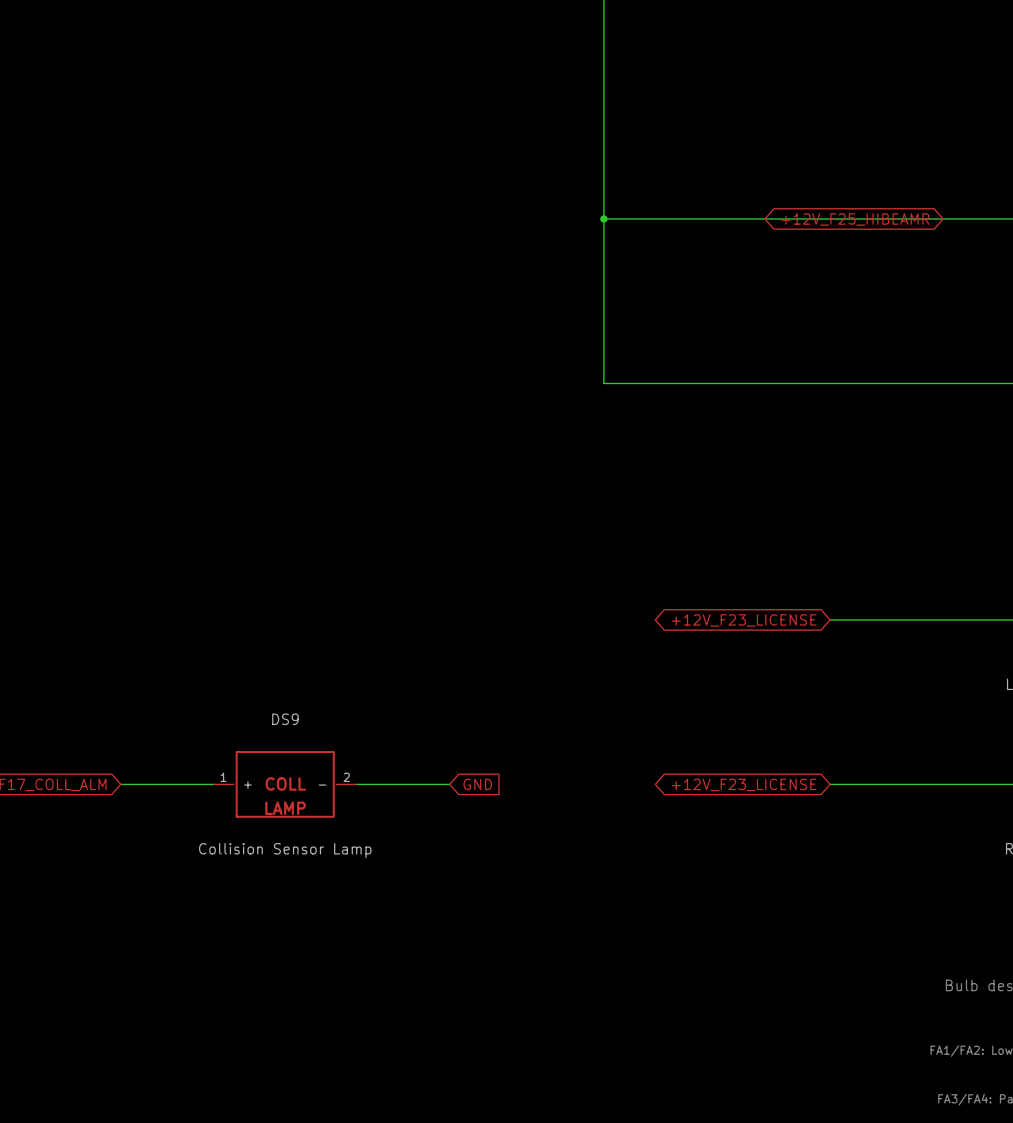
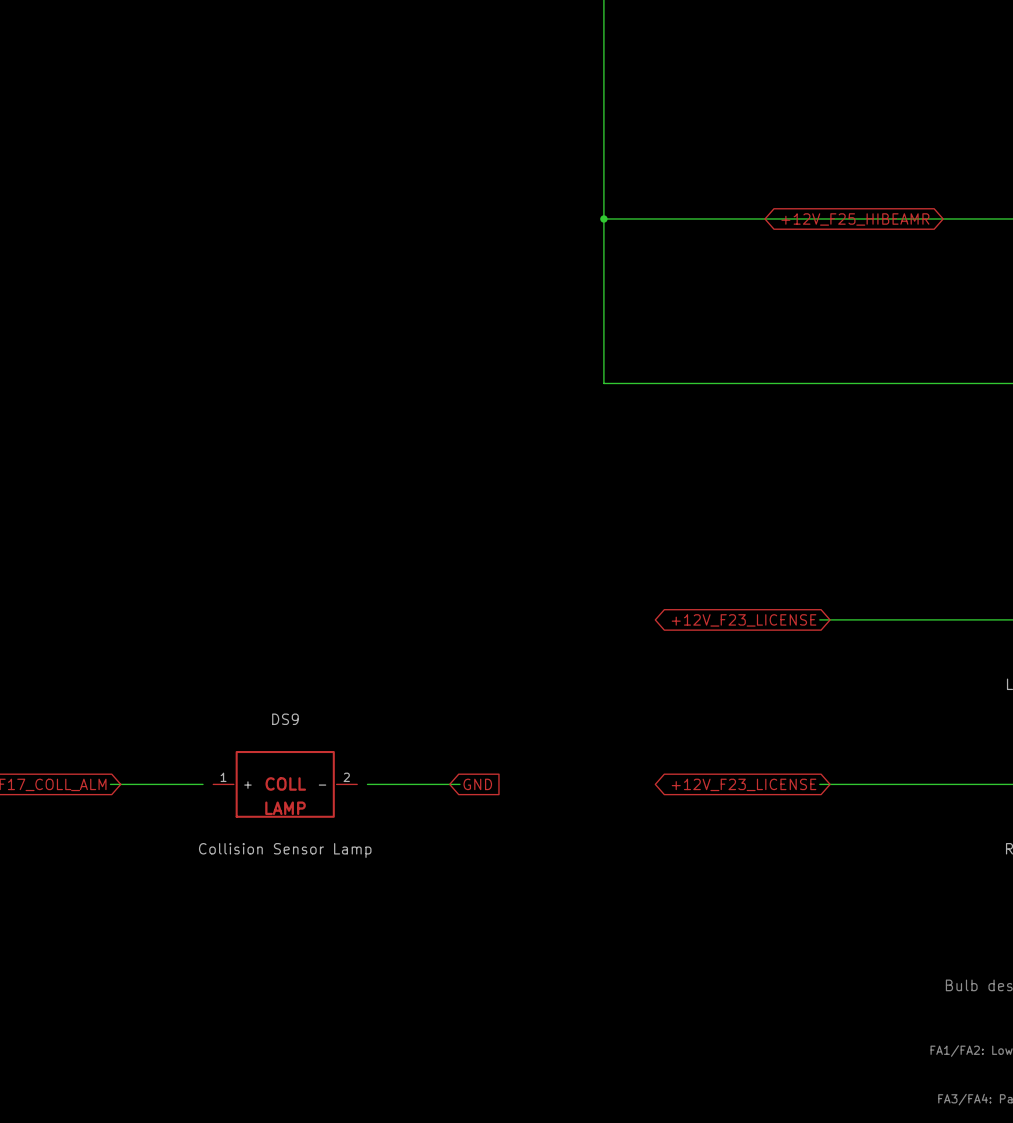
wire: none -> (819, 619) (830, 619)
wire: (202, 784) (213, 784) -> (110, 784) (120, 784)
wire: (357, 784) (367, 784) -> (449, 784) (460, 784)
wire: none -> (819, 784) (830, 784)

